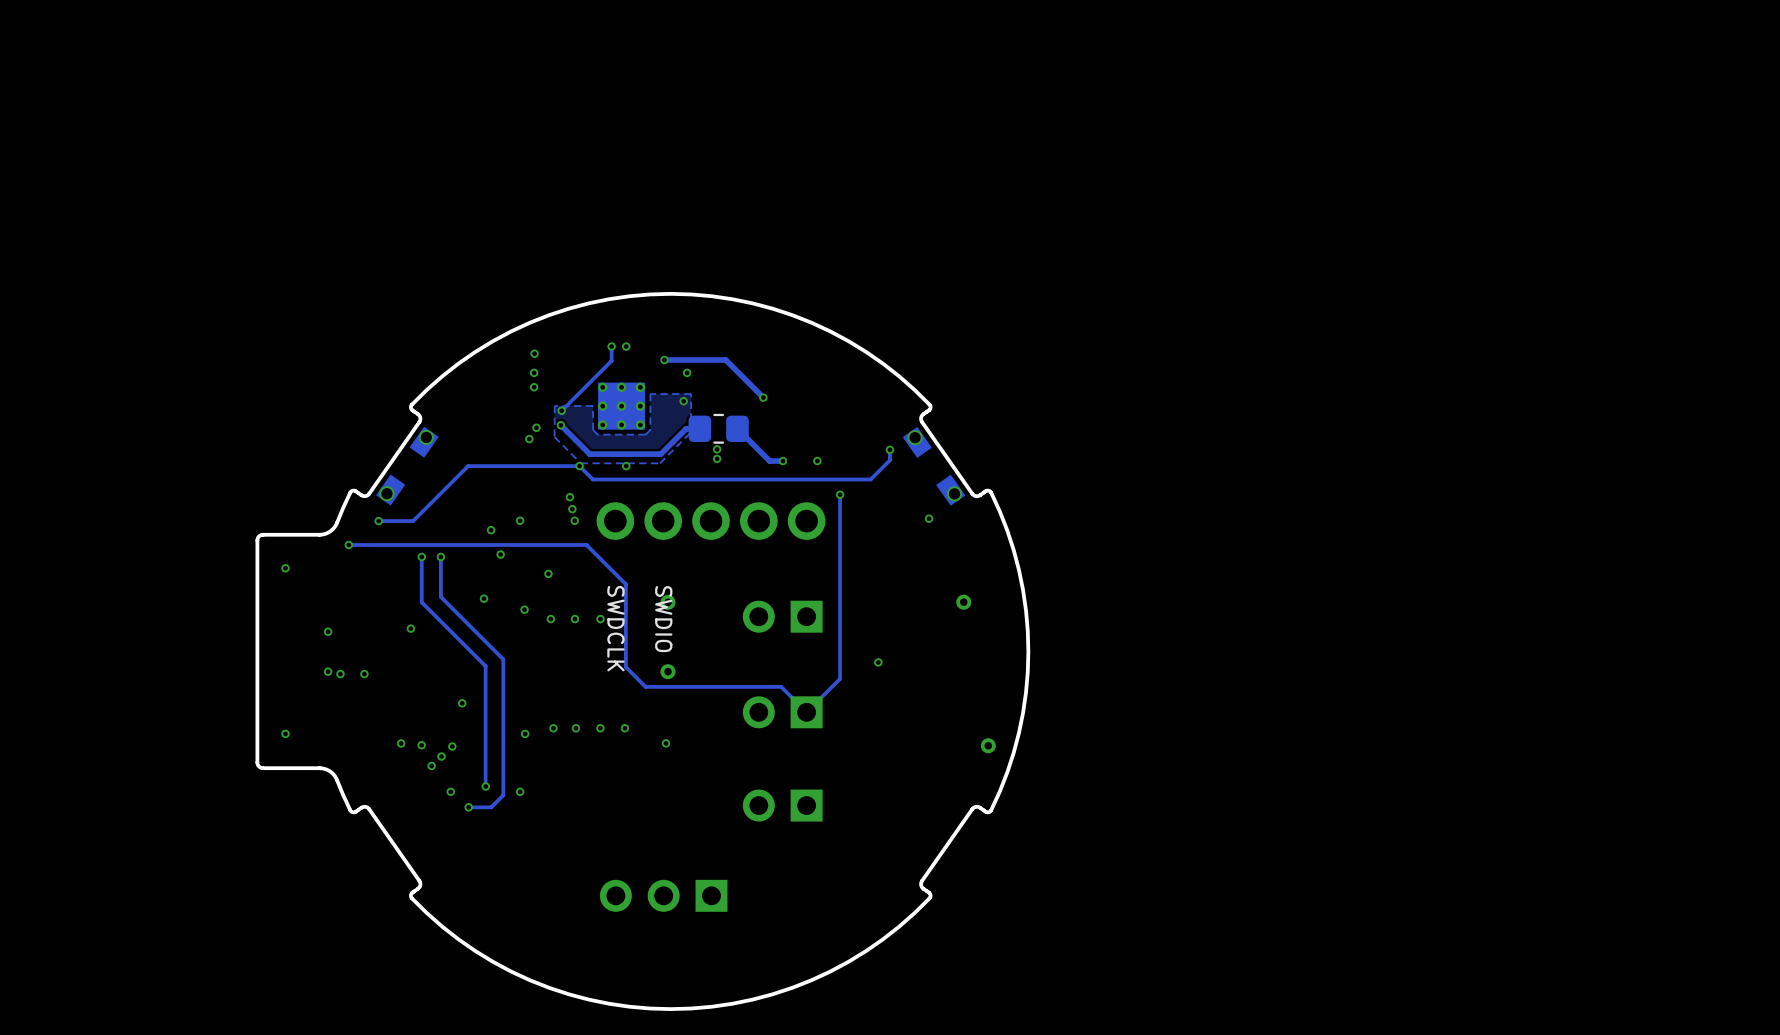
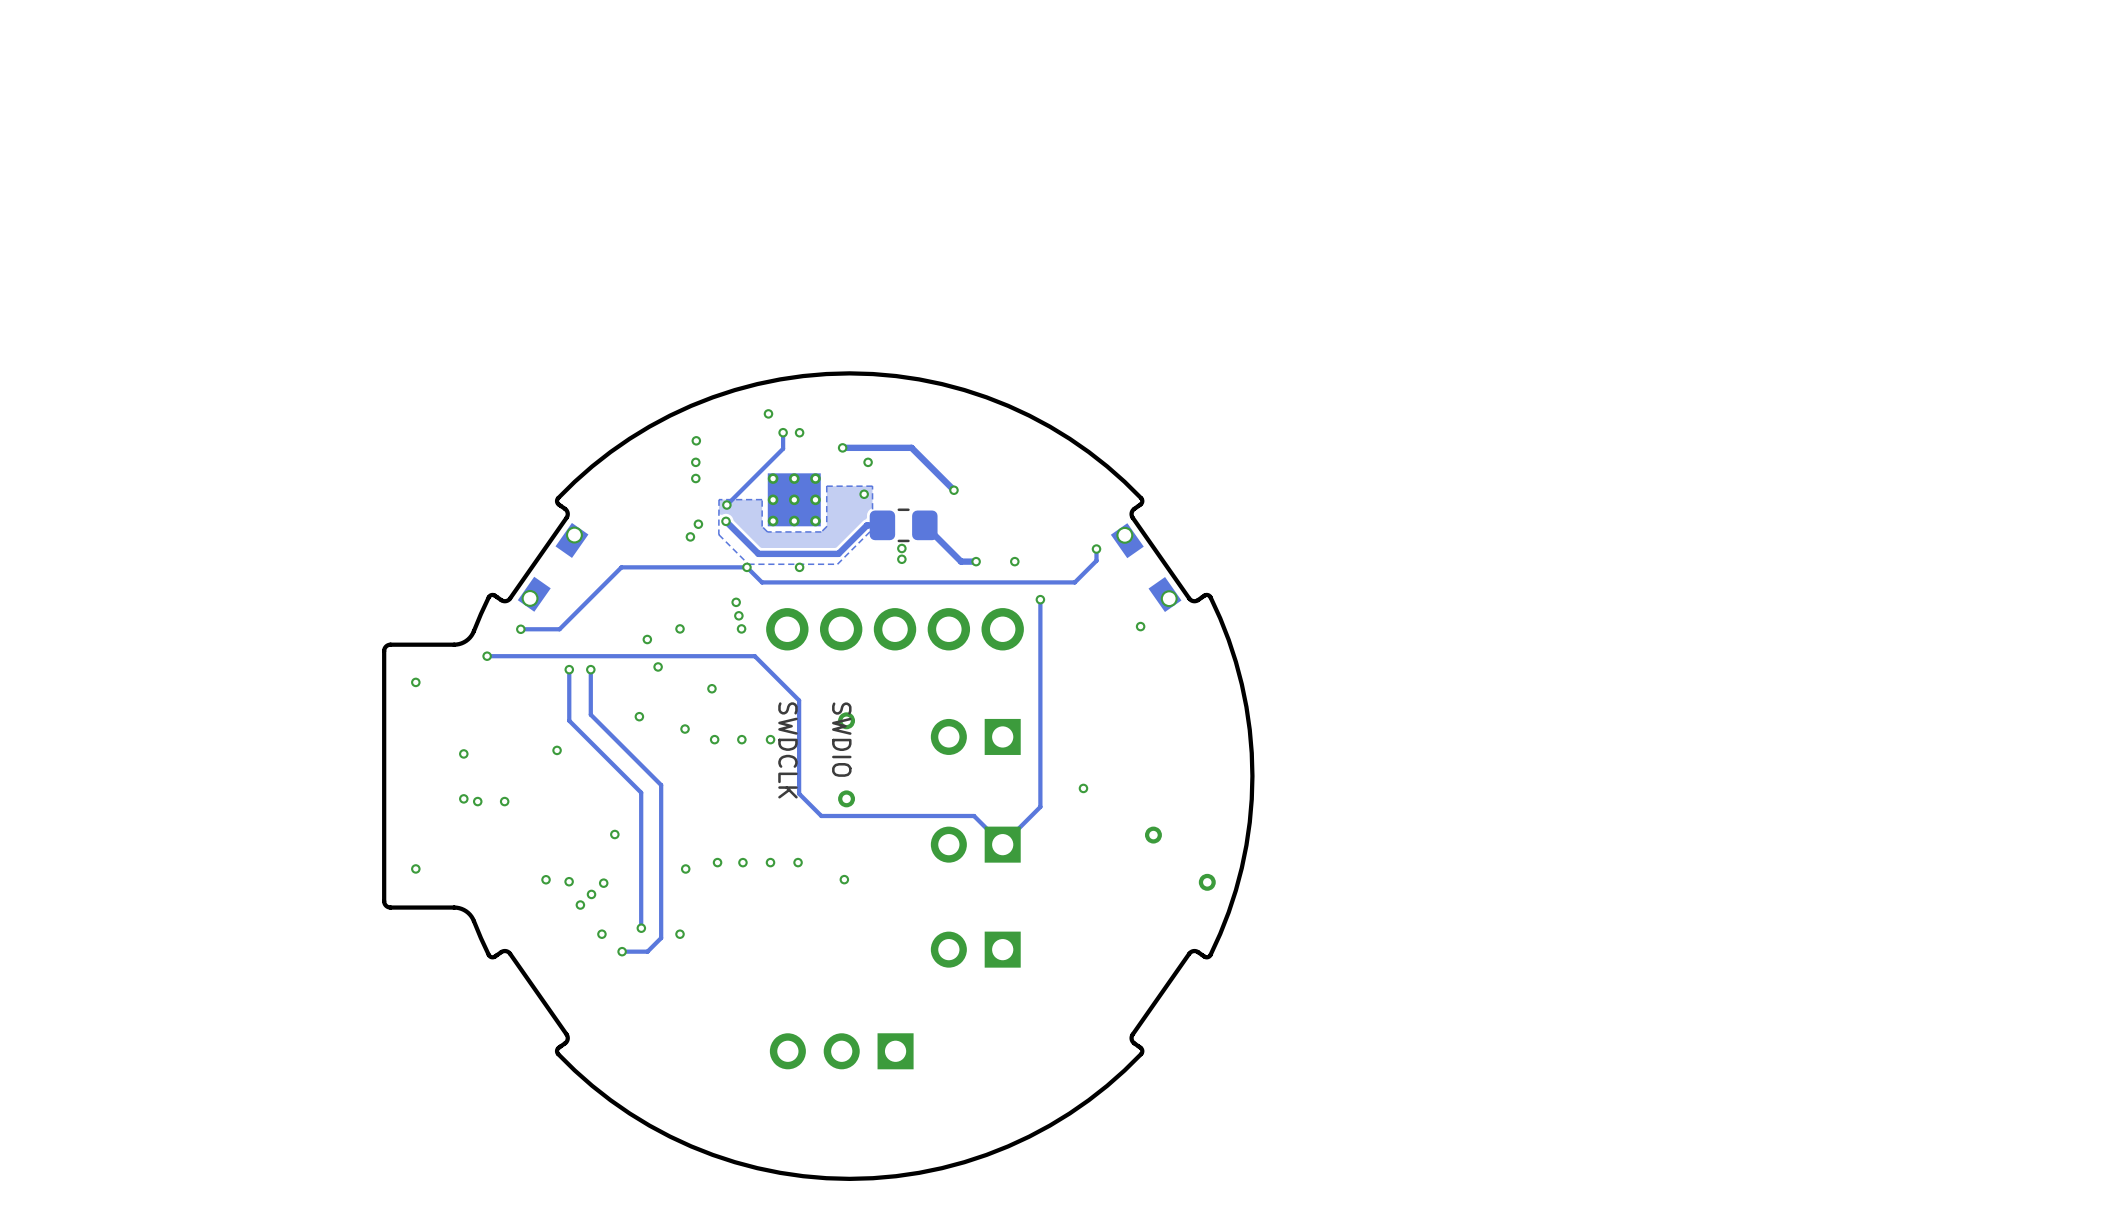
via: none -> (768, 413)
via position: (963, 602) -> (1153, 835)

